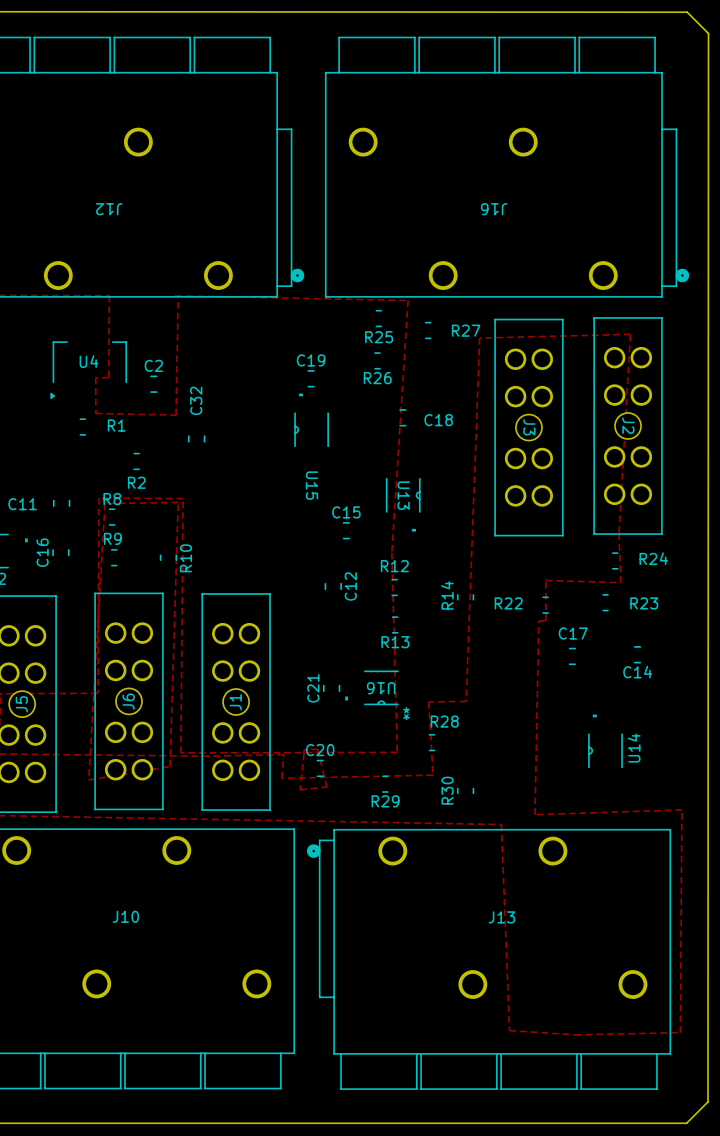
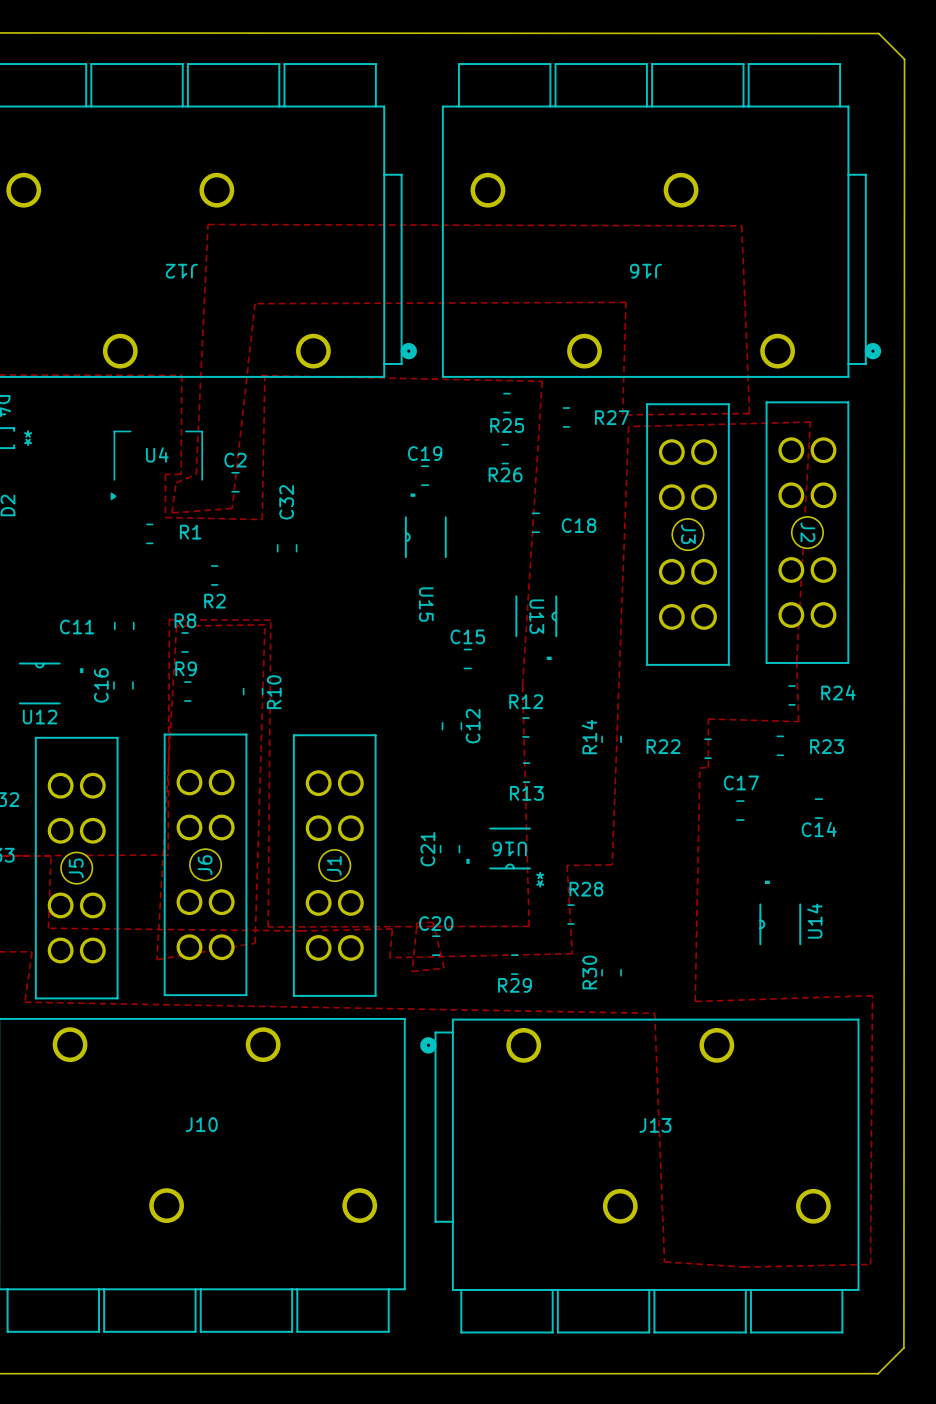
zone outline: none -> (207, 224) (196, 474) (175, 482) (172, 512) (232, 508) (255, 303) (625, 302) (622, 414) (749, 413) (741, 225) (207, 224)

